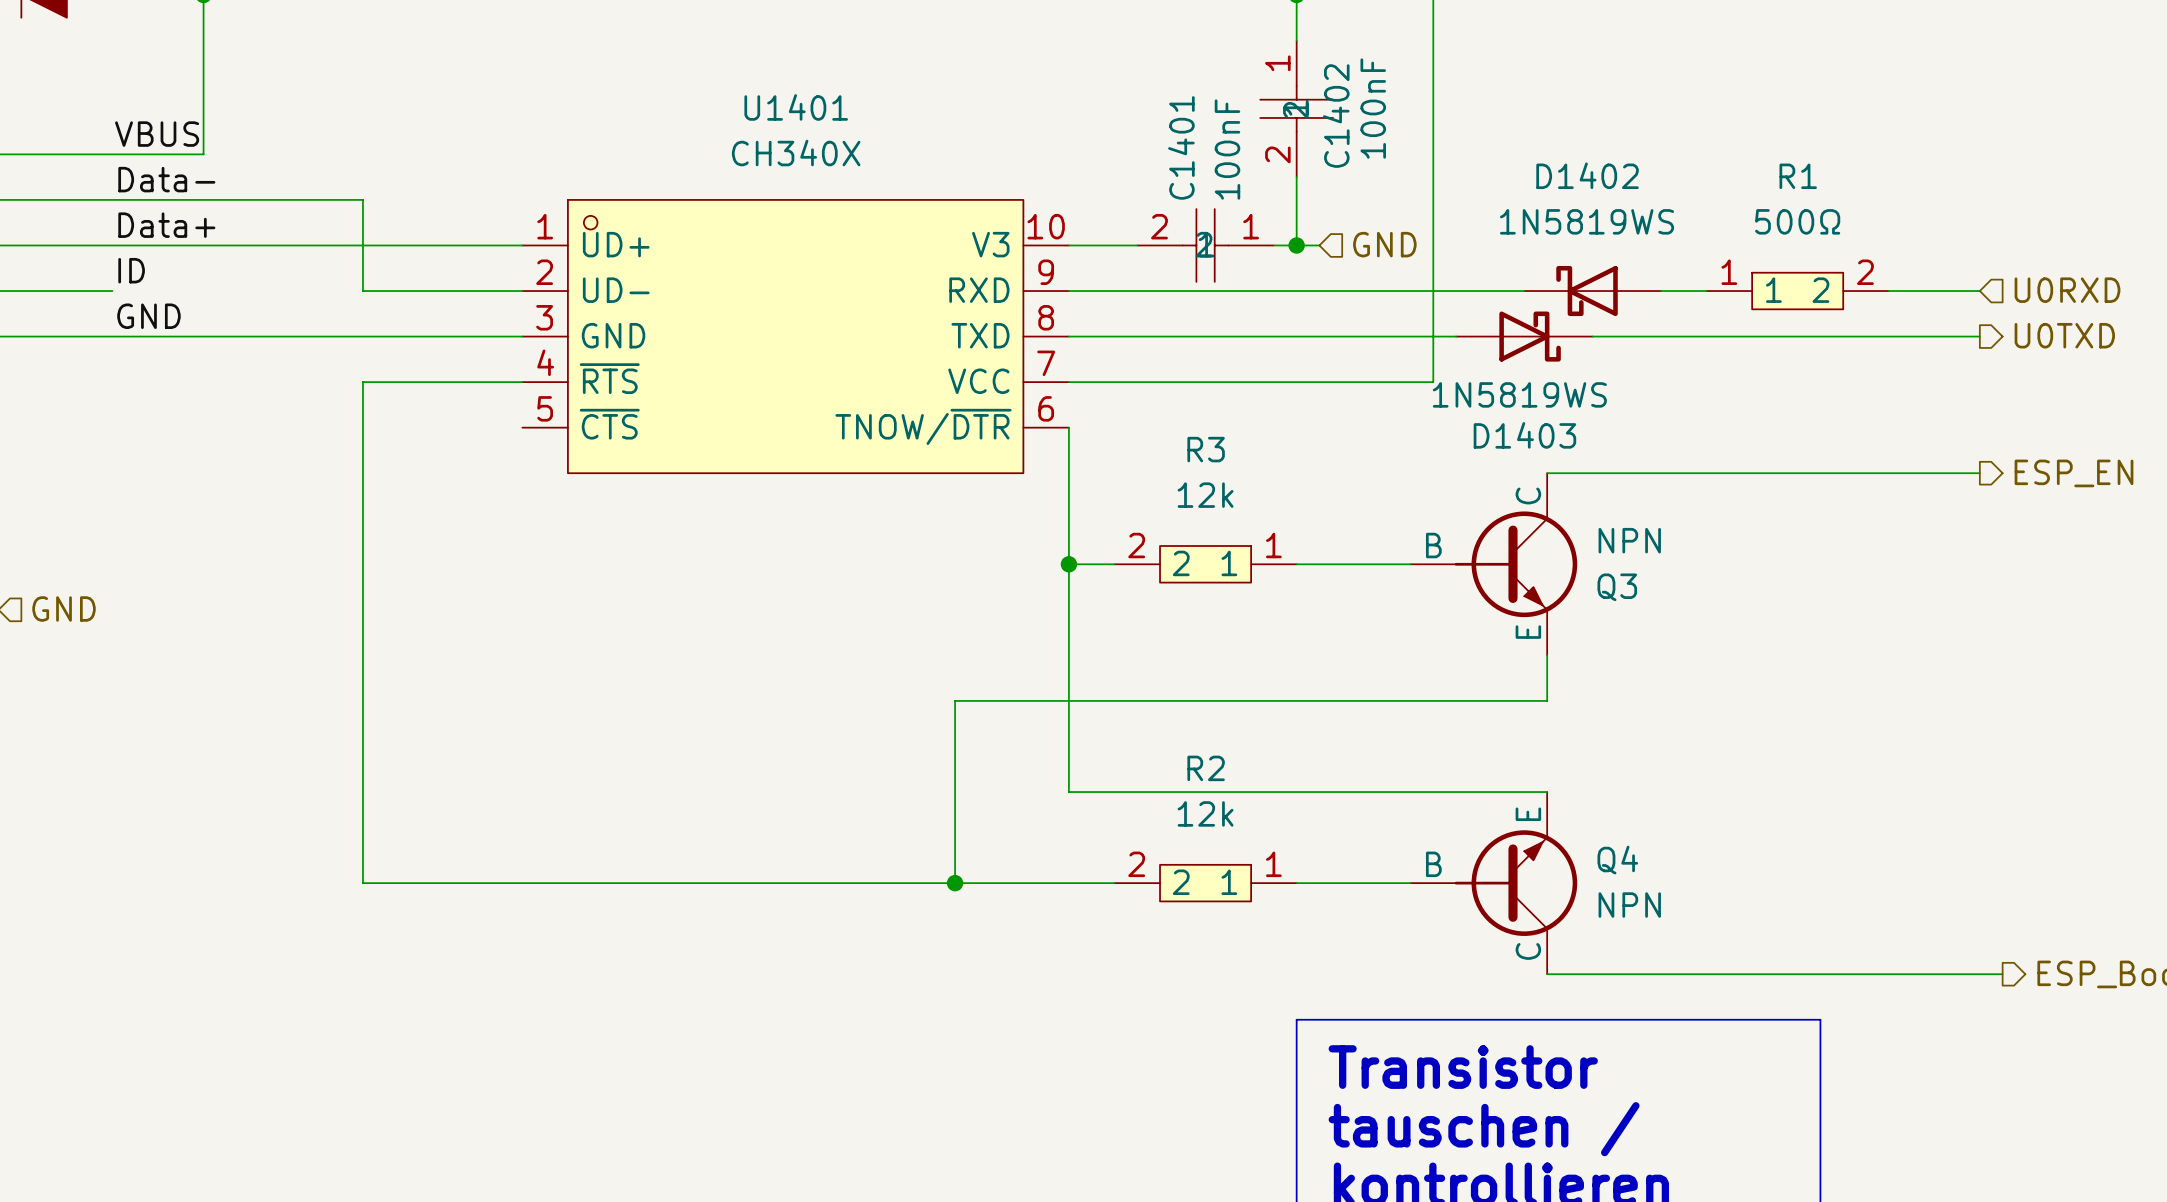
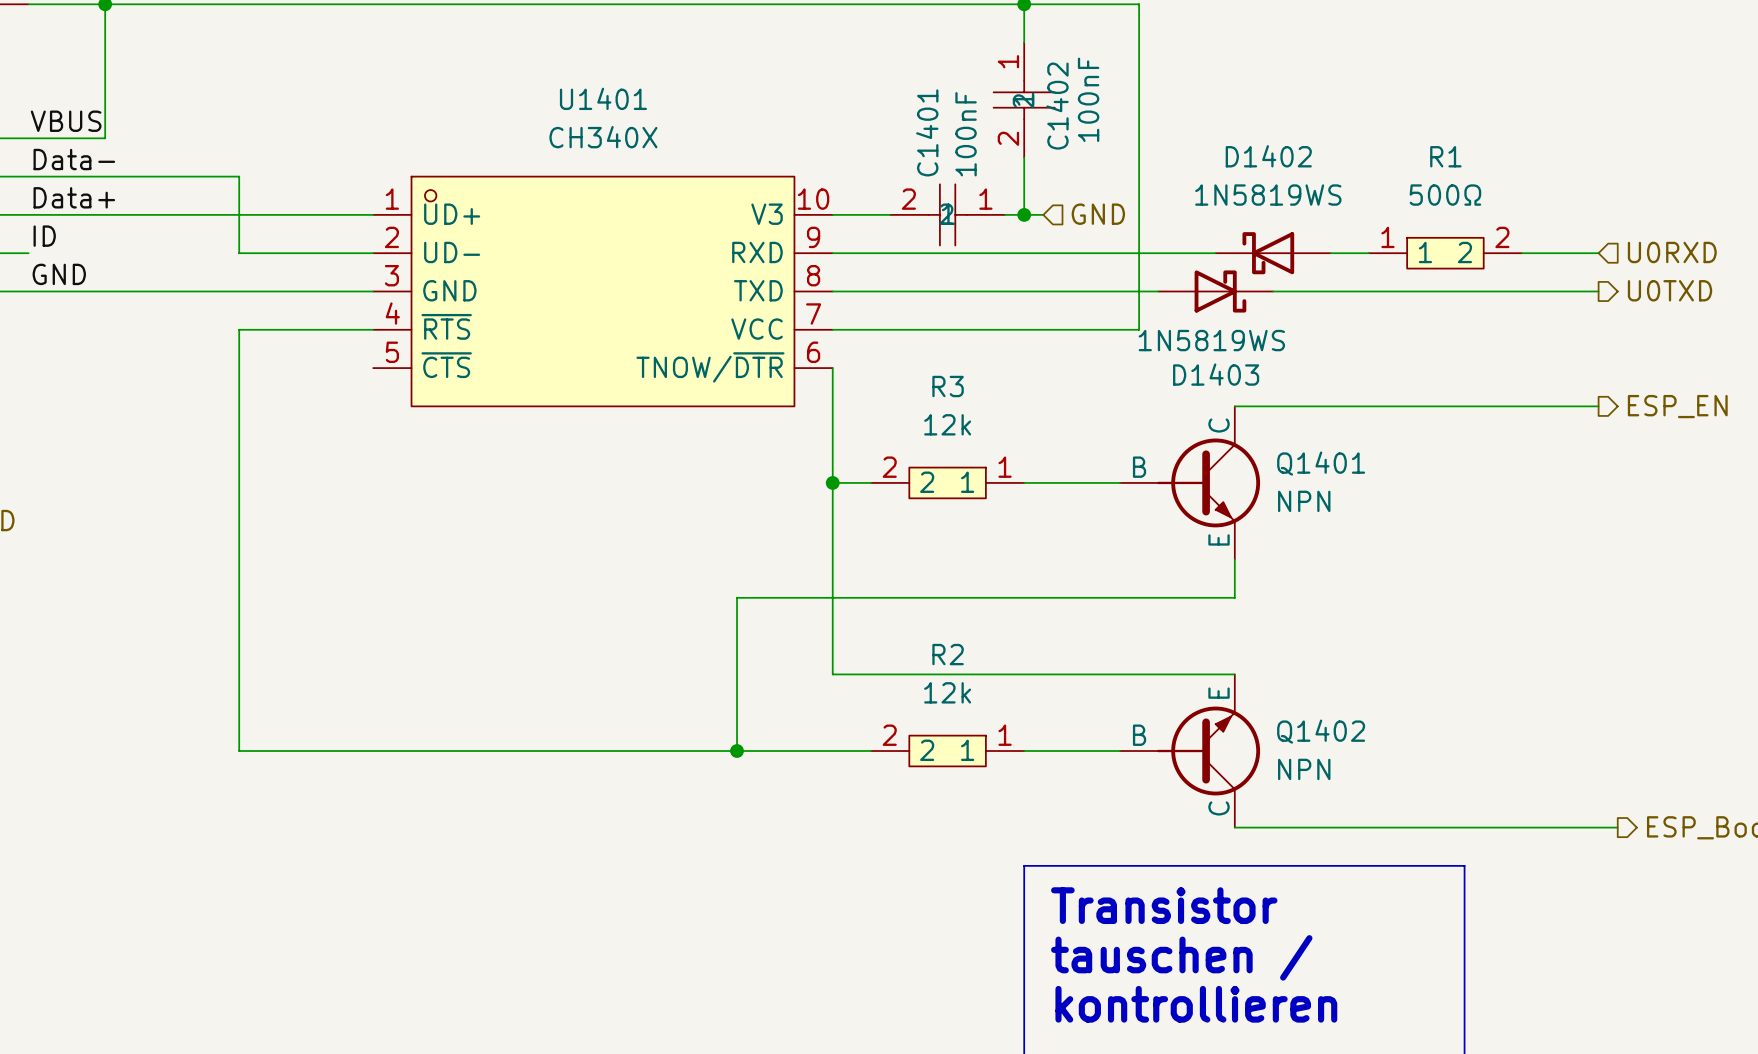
Q3 value position: NPN (1629, 540) -> NPN (1304, 501)
Q3 name: Q3 (1617, 587) -> Q1401 (1321, 463)
Q4 name: Q4 (1617, 860) -> Q1402 (1321, 731)

